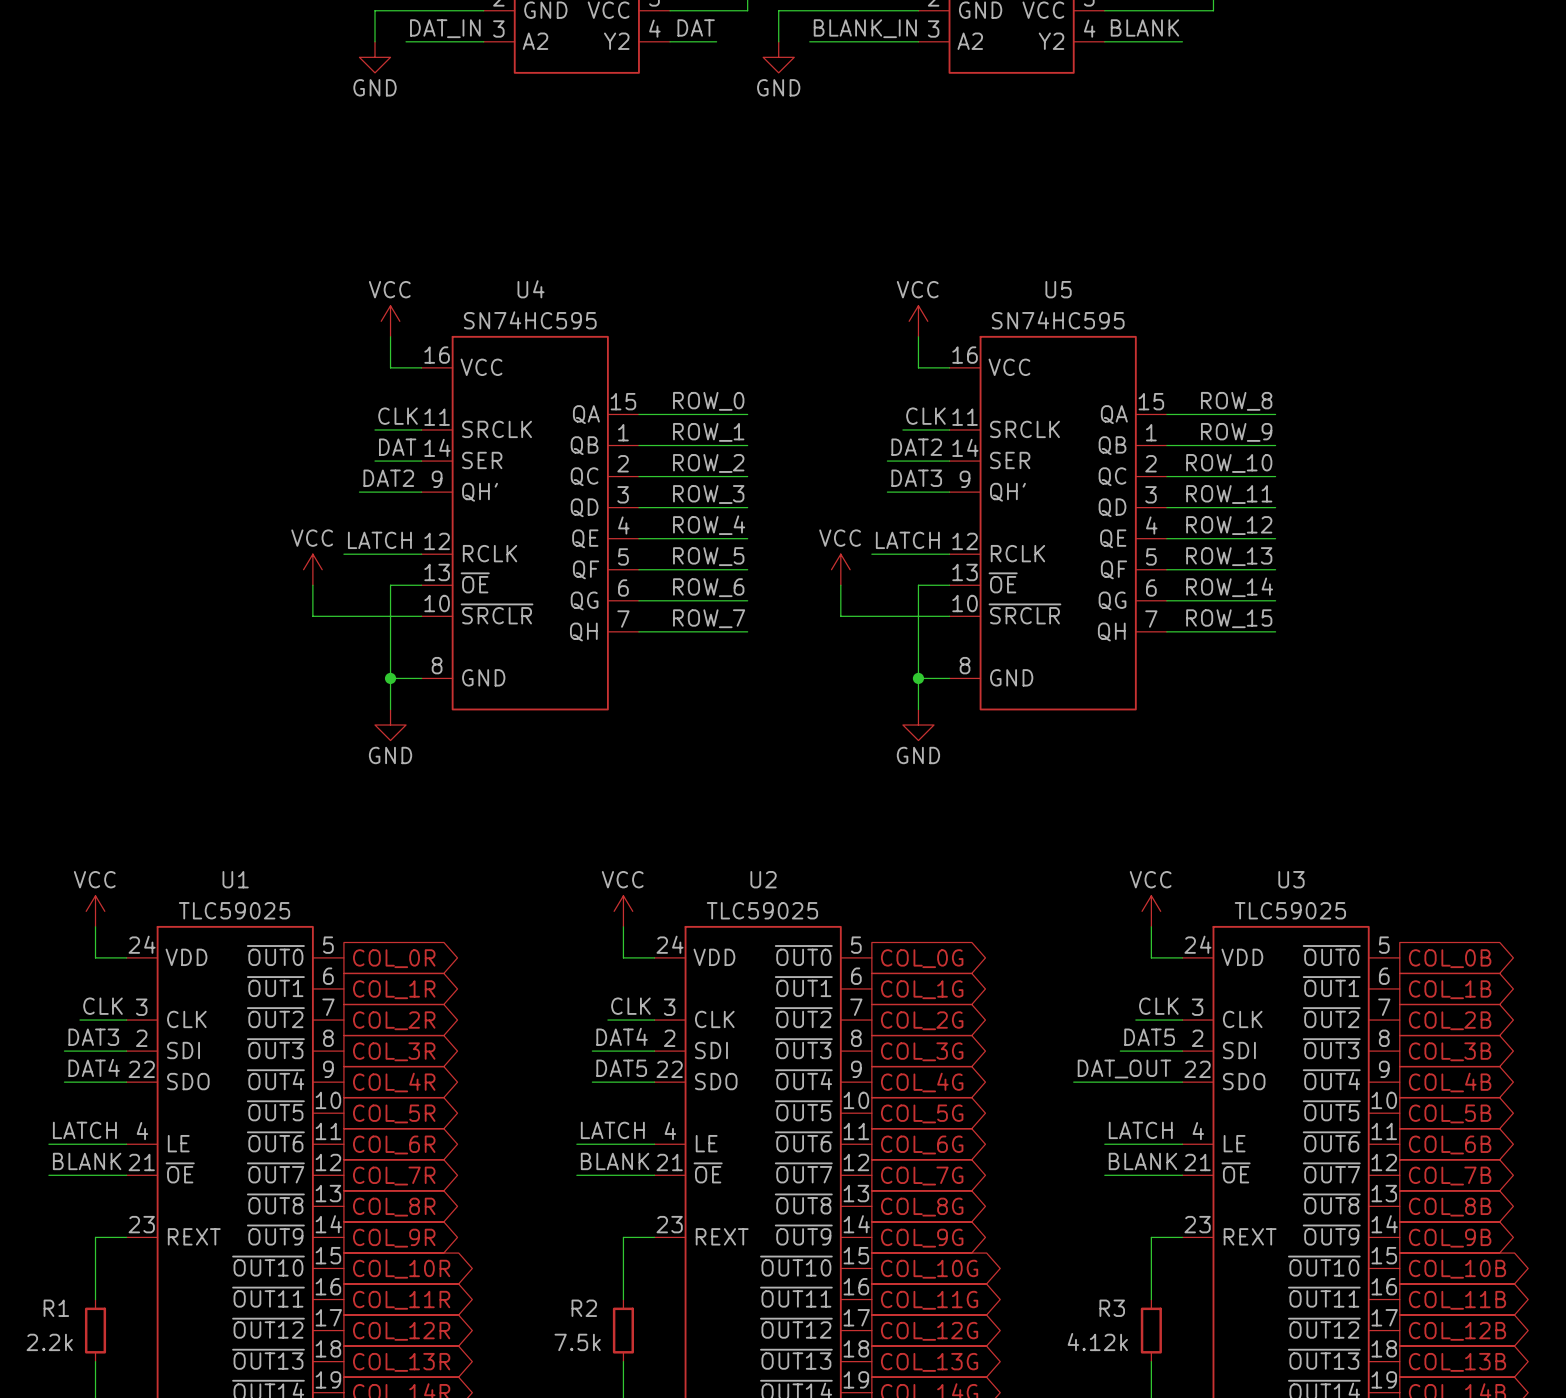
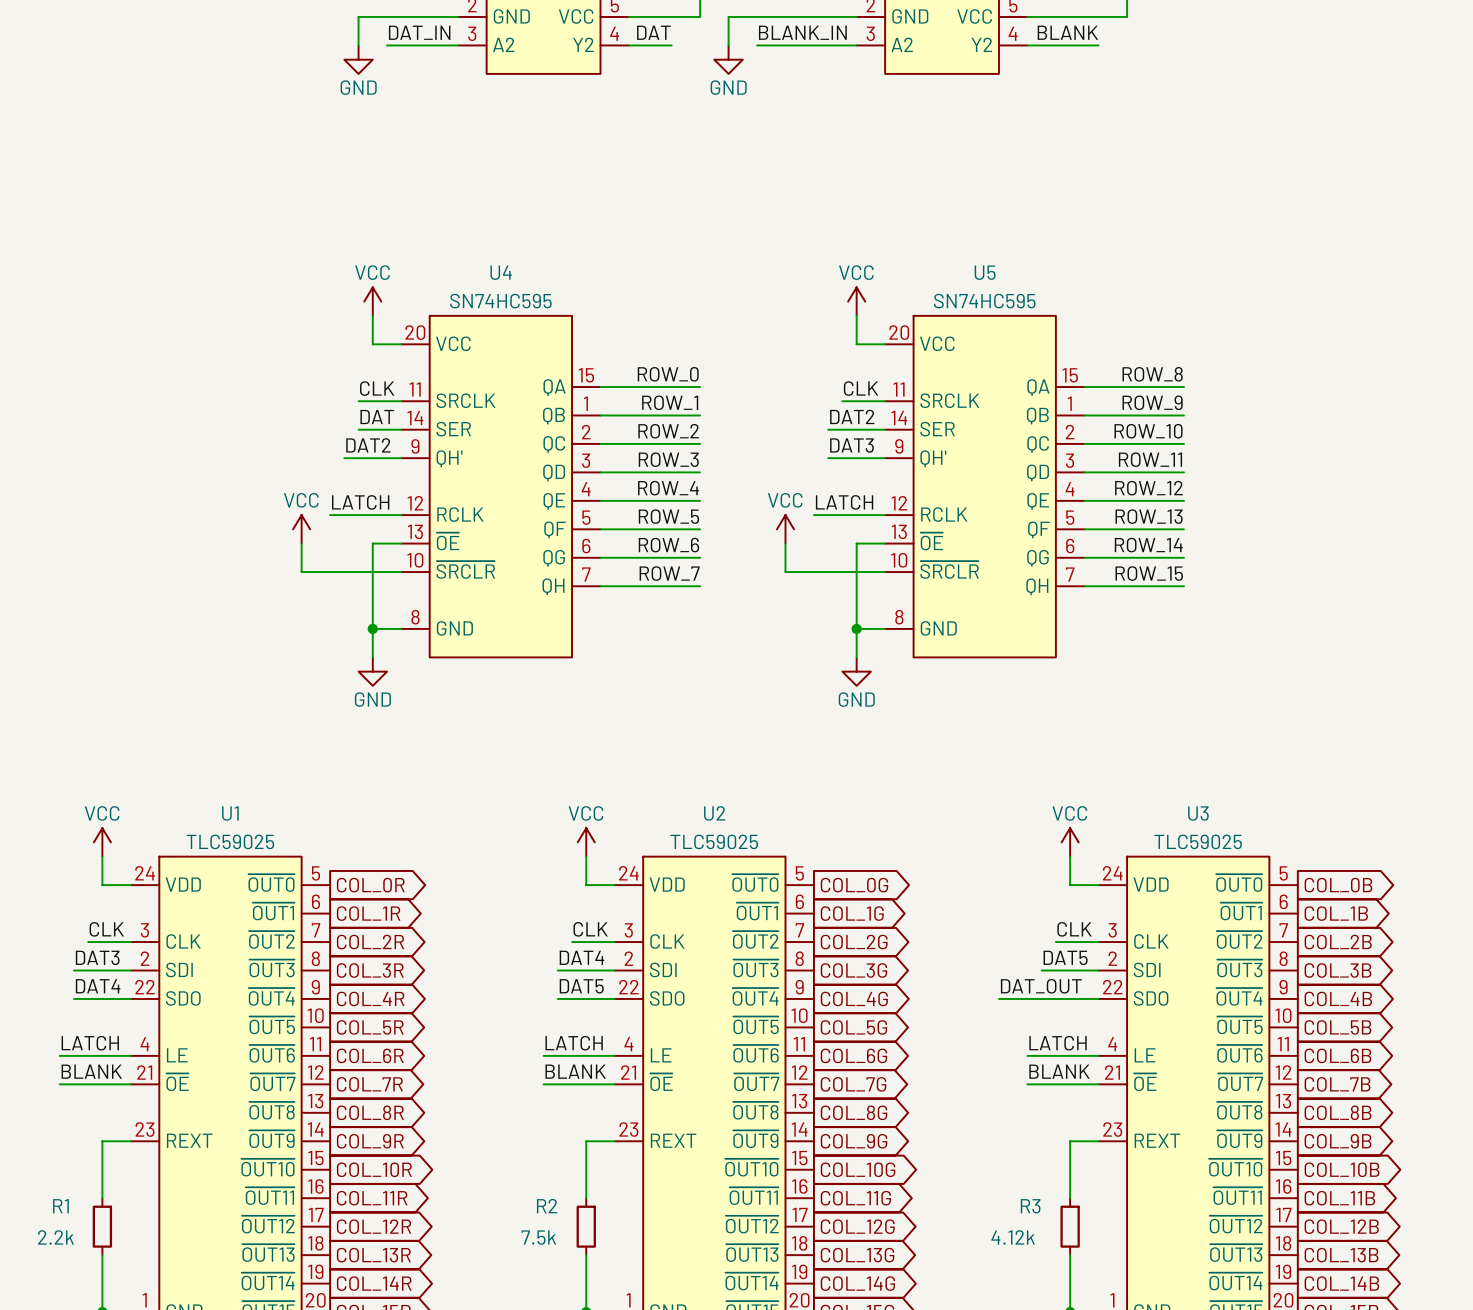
U4 pin number: 16 (437, 355) -> 20 (415, 332)
U5 pin number: 16 (965, 355) -> 20 (899, 332)

